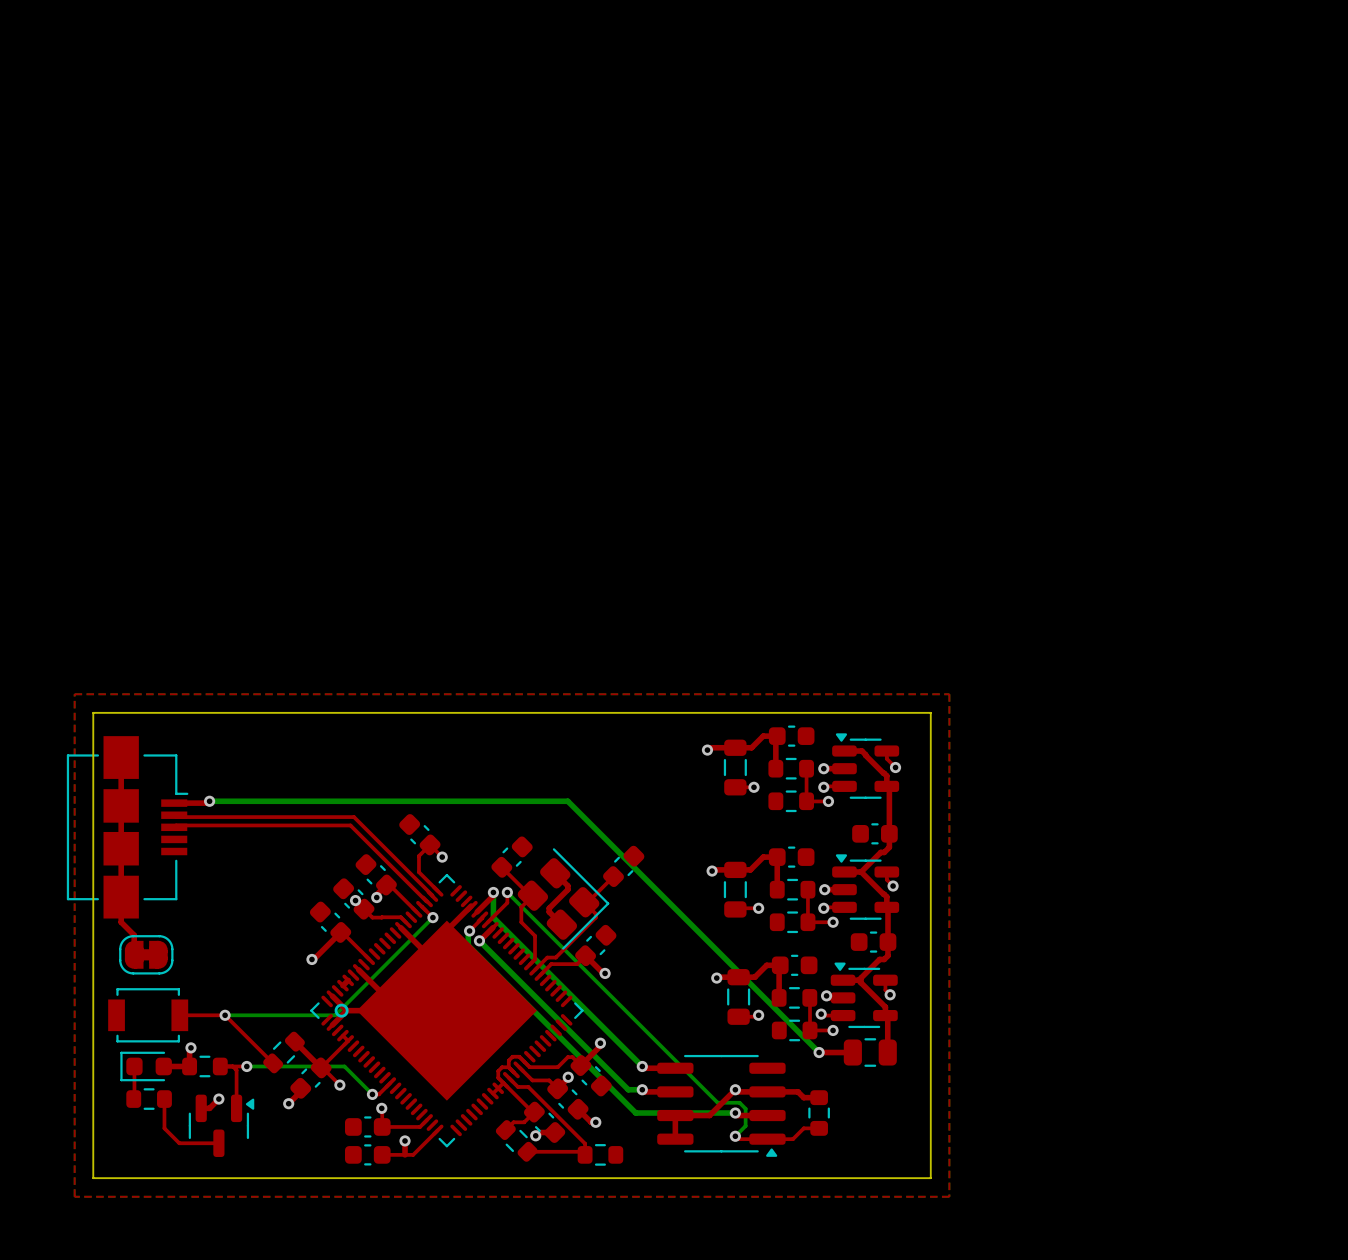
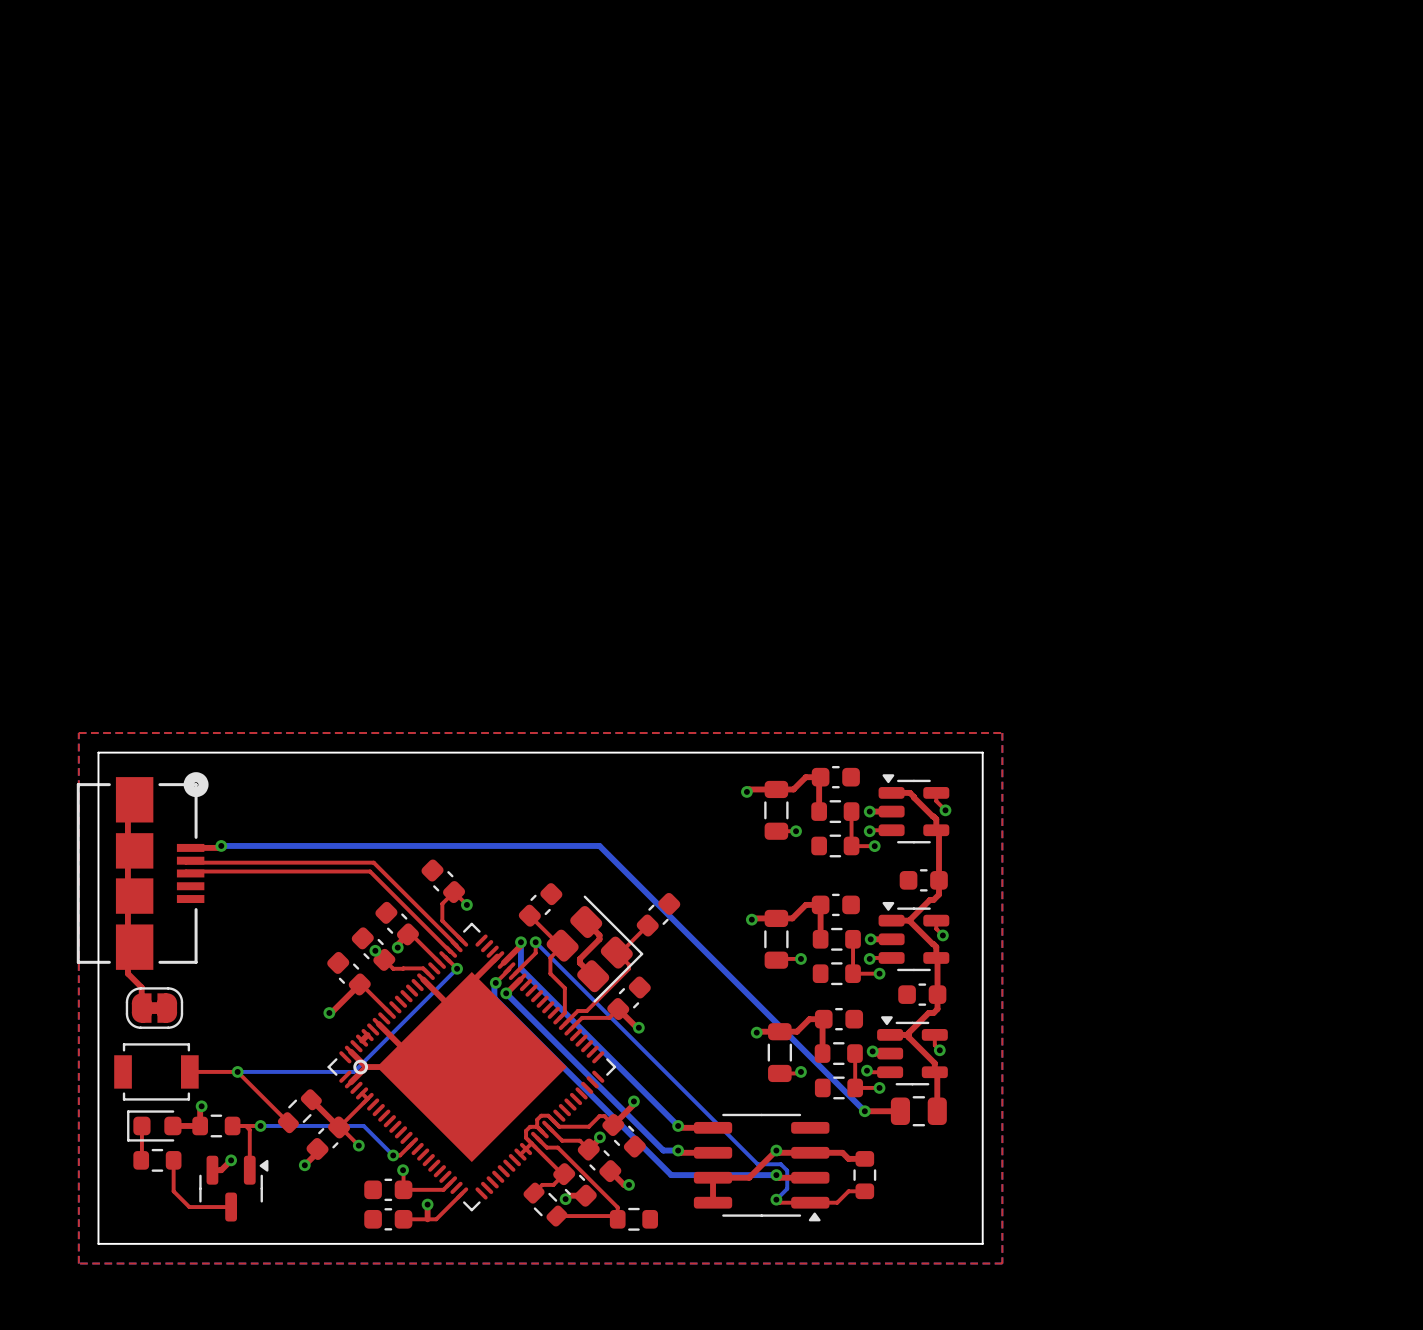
part footprint: [66, 736, 189, 919] -> [76, 772, 209, 970]

